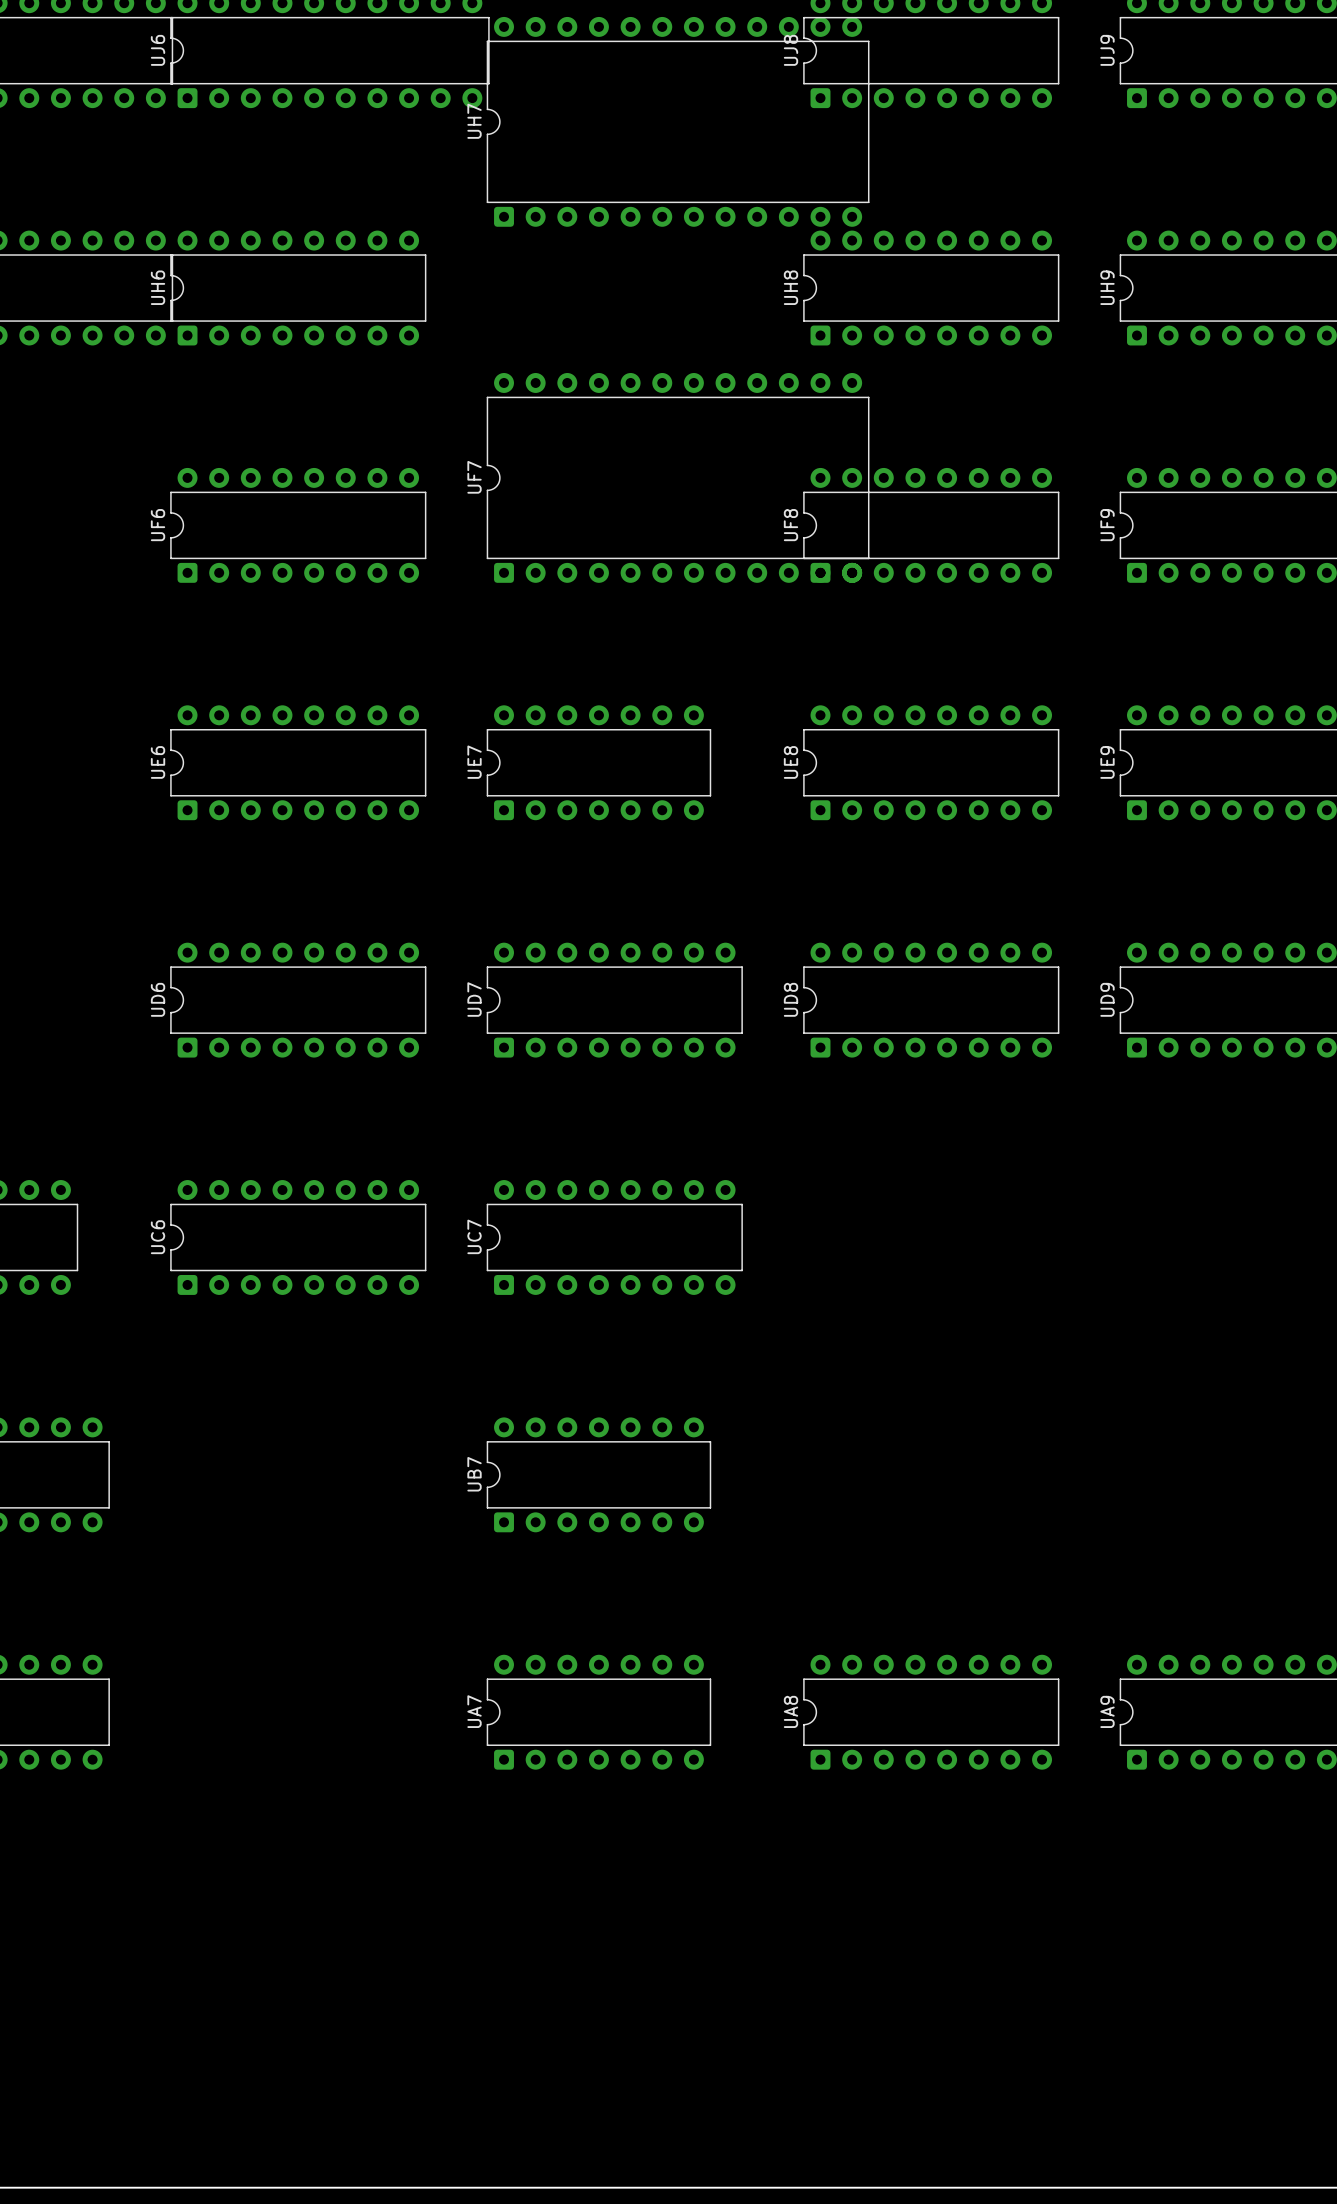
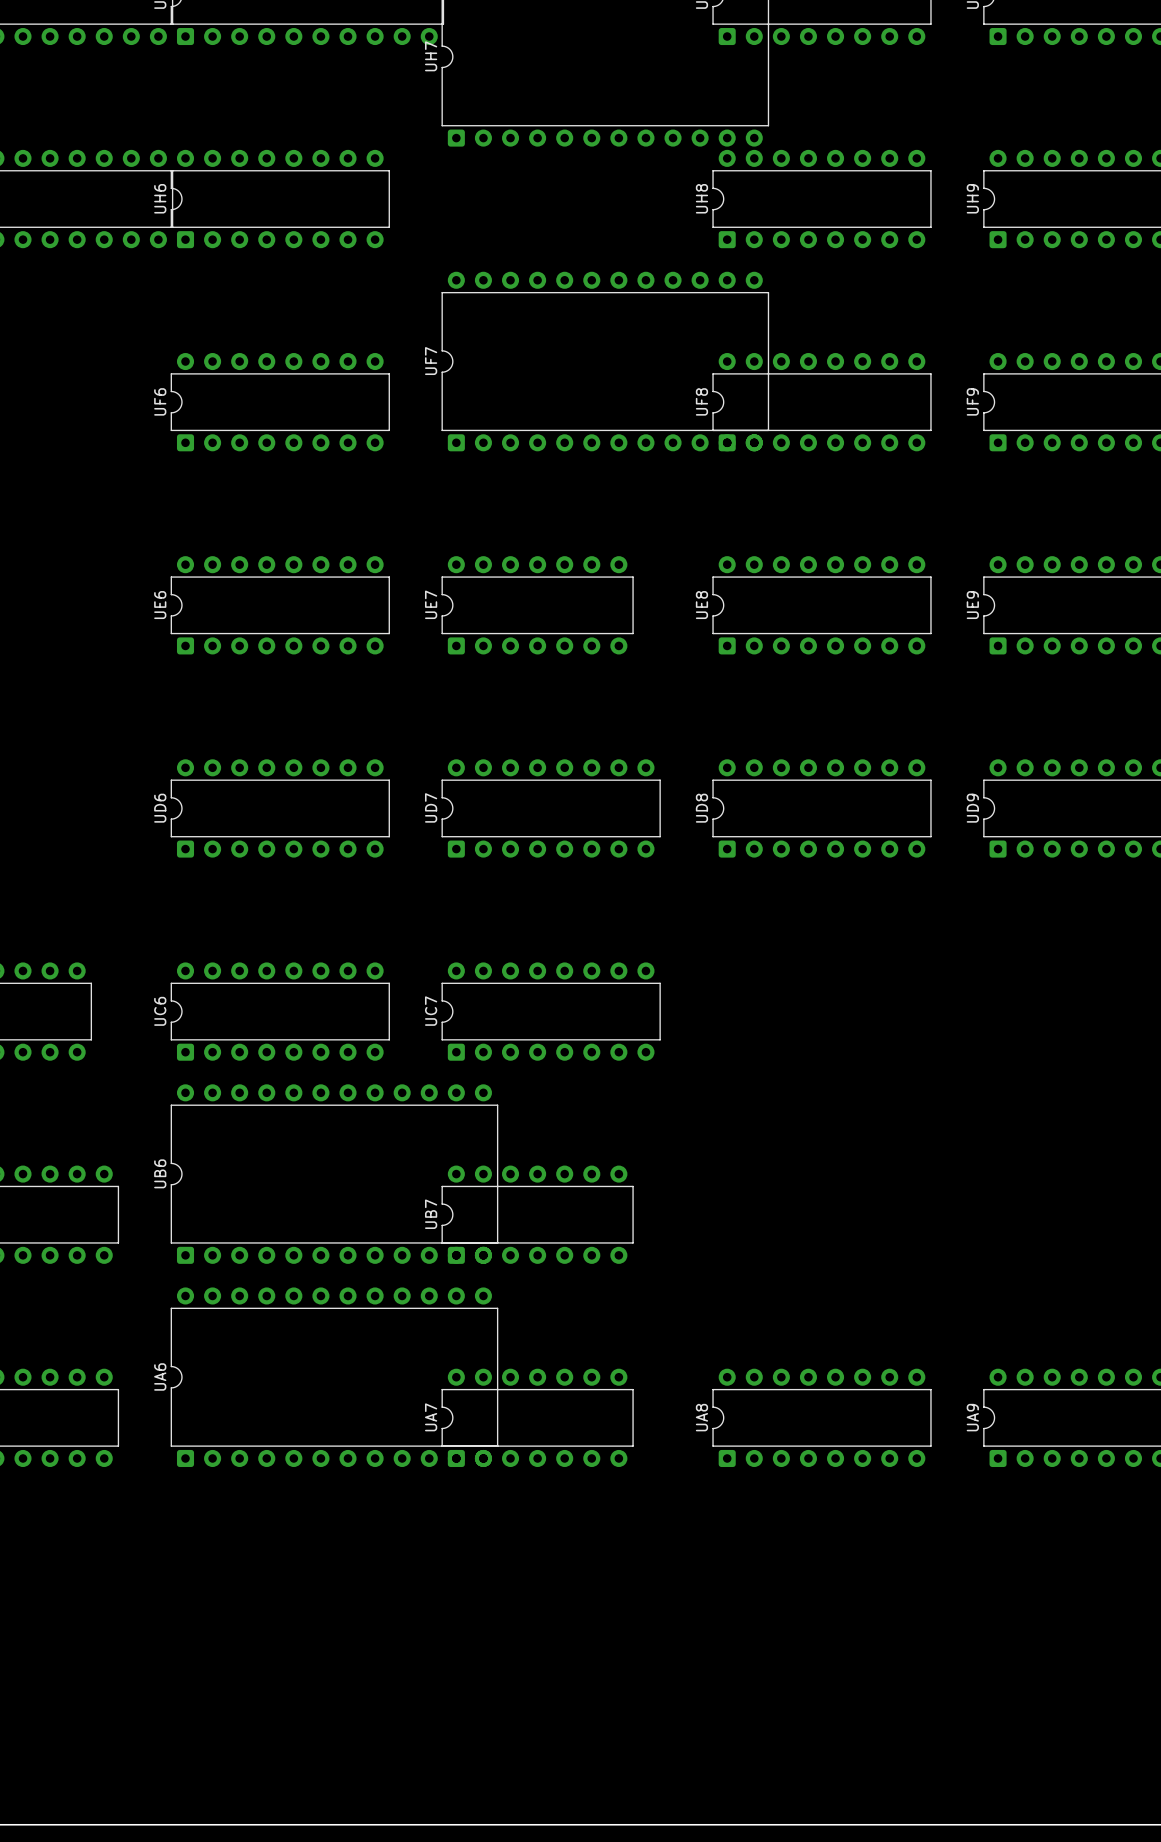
UB6: none -> (334, 1174)
UA6: none -> (334, 1377)

